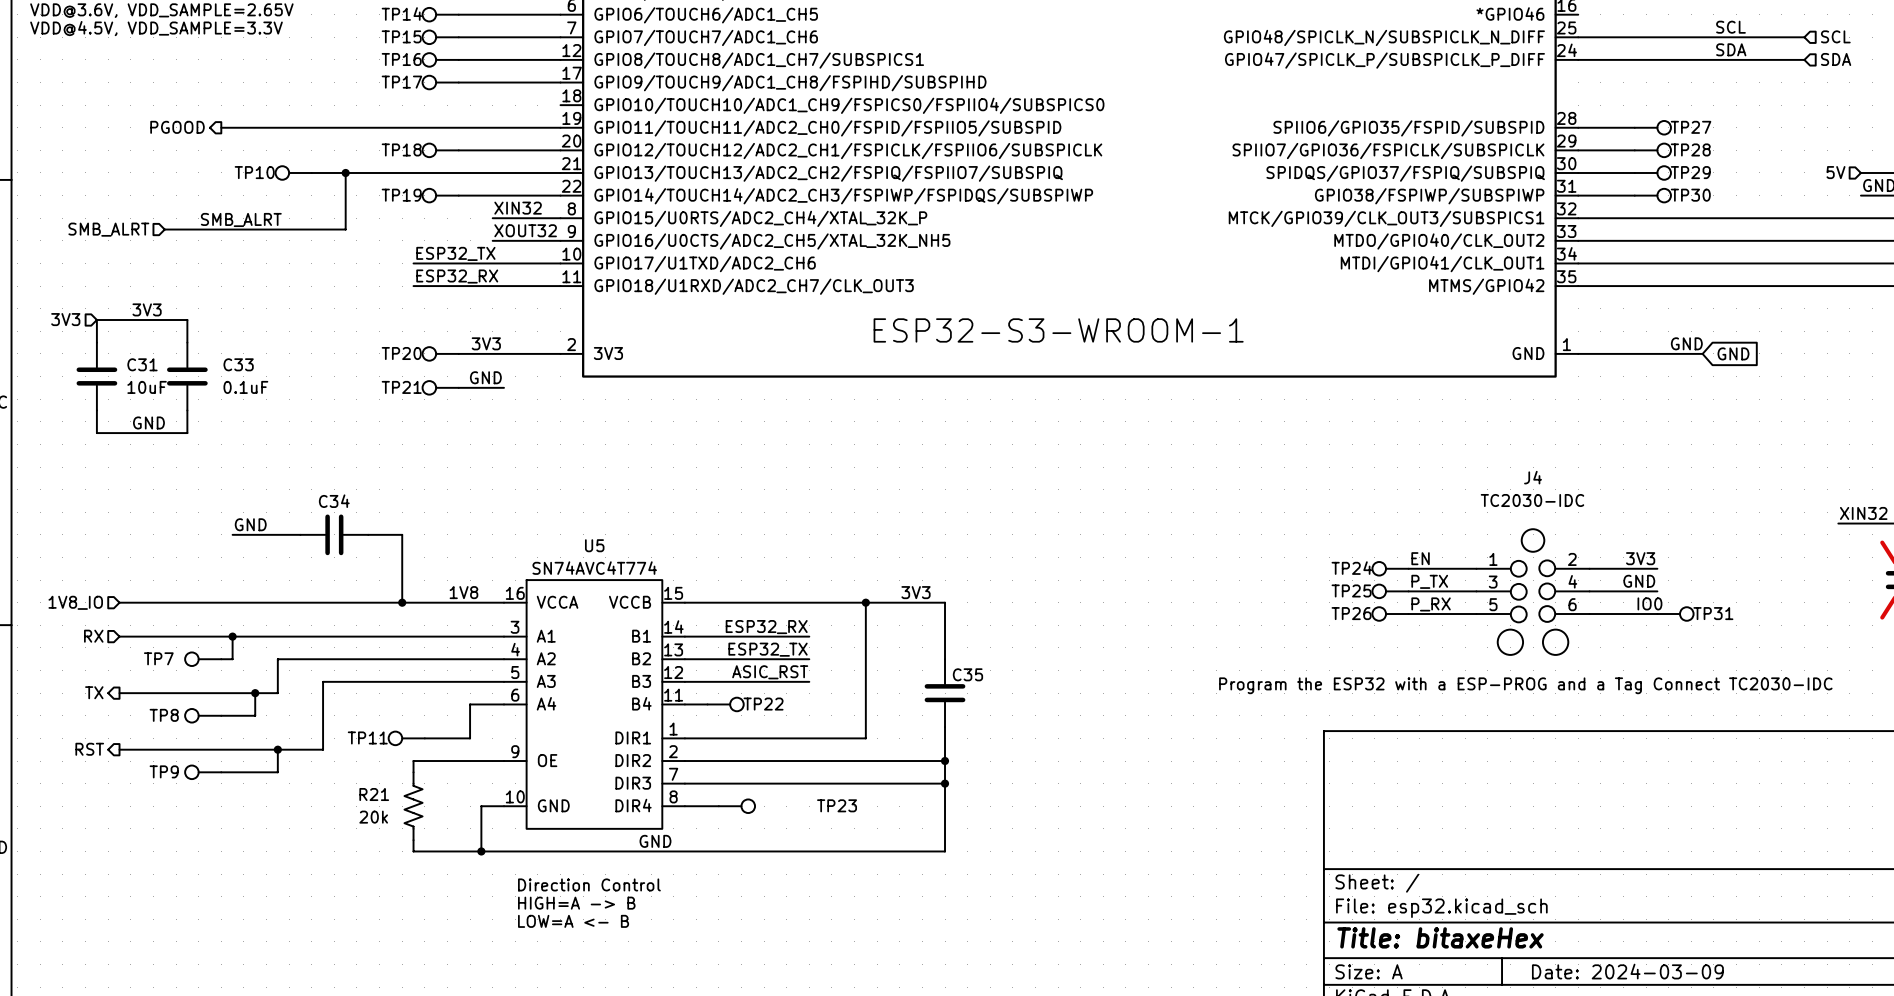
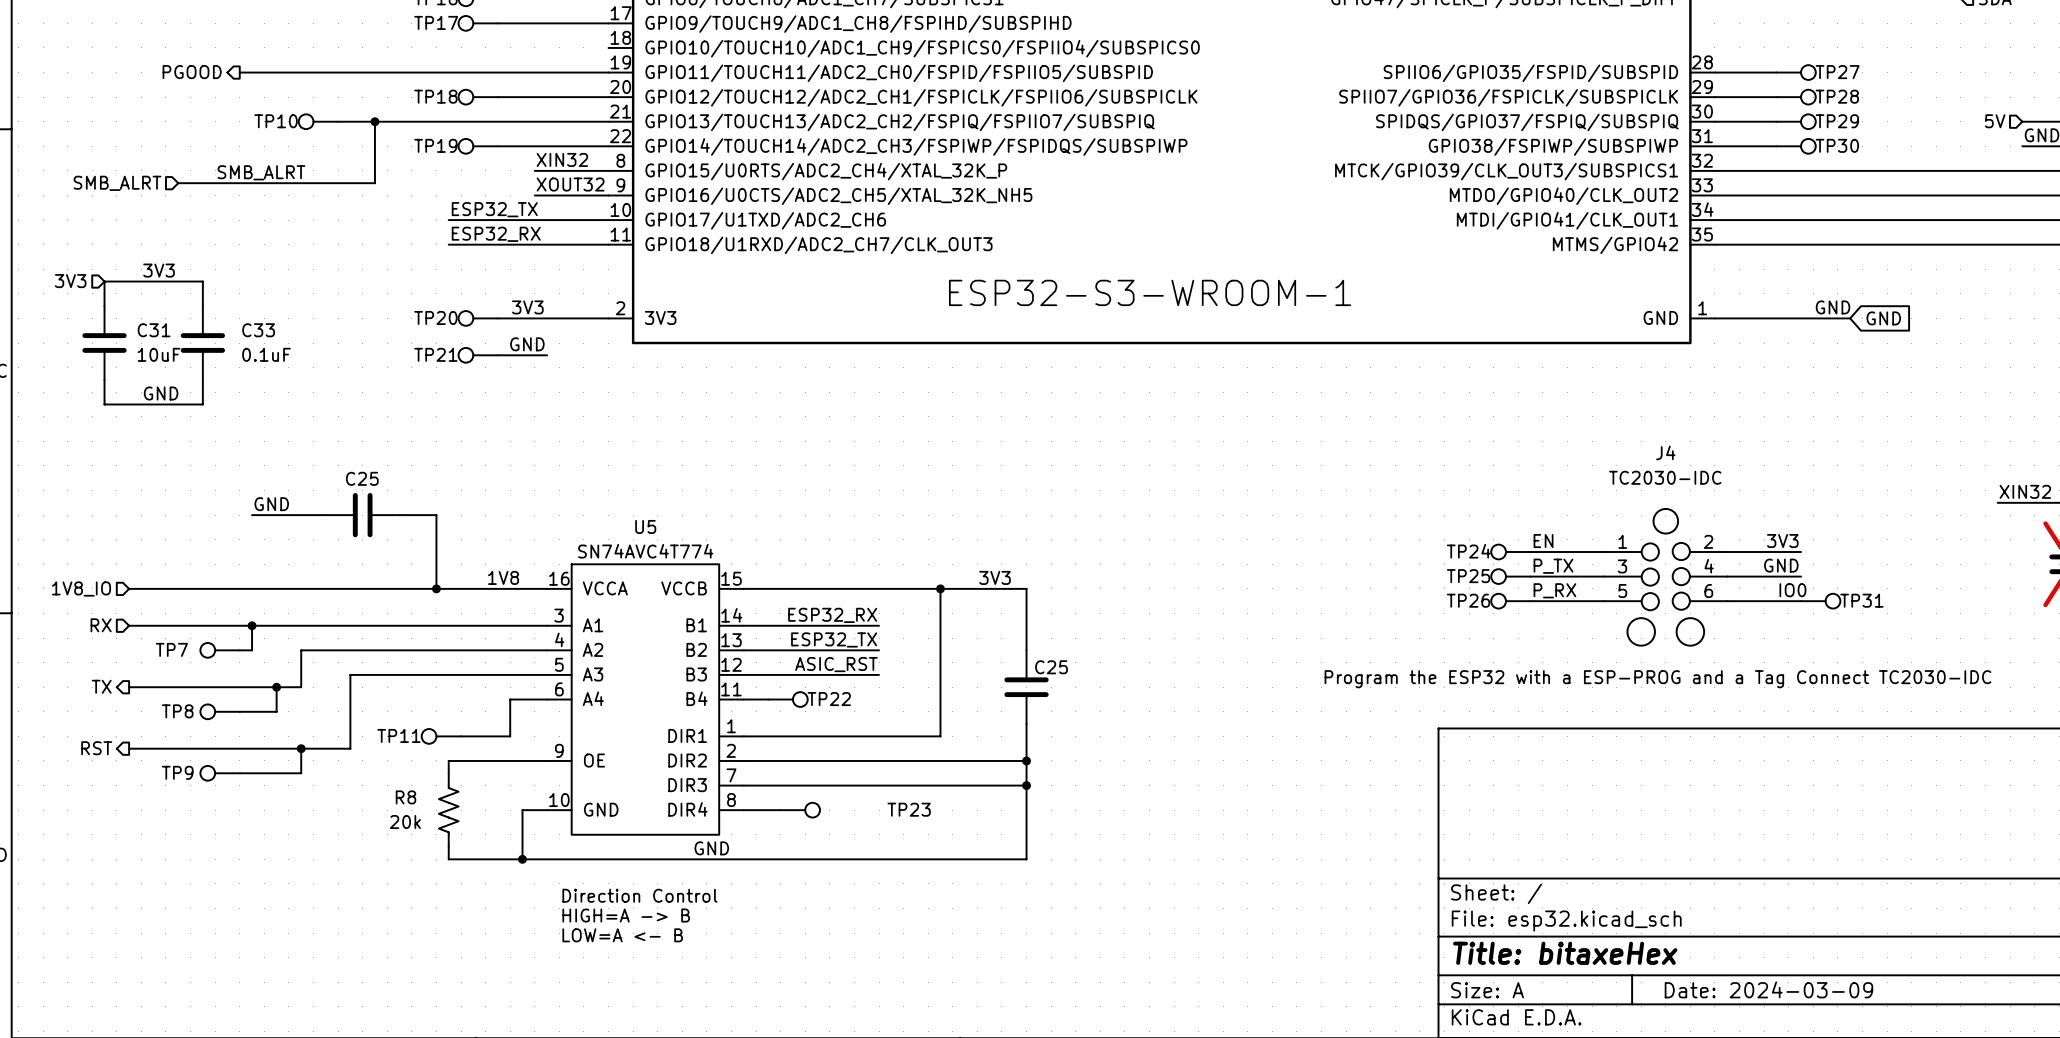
C34 name: C34 (334, 501) -> C25 (362, 478)
C35 name: C35 (967, 674) -> C25 (1051, 667)
R21 name: R21 (374, 794) -> R8 (406, 797)

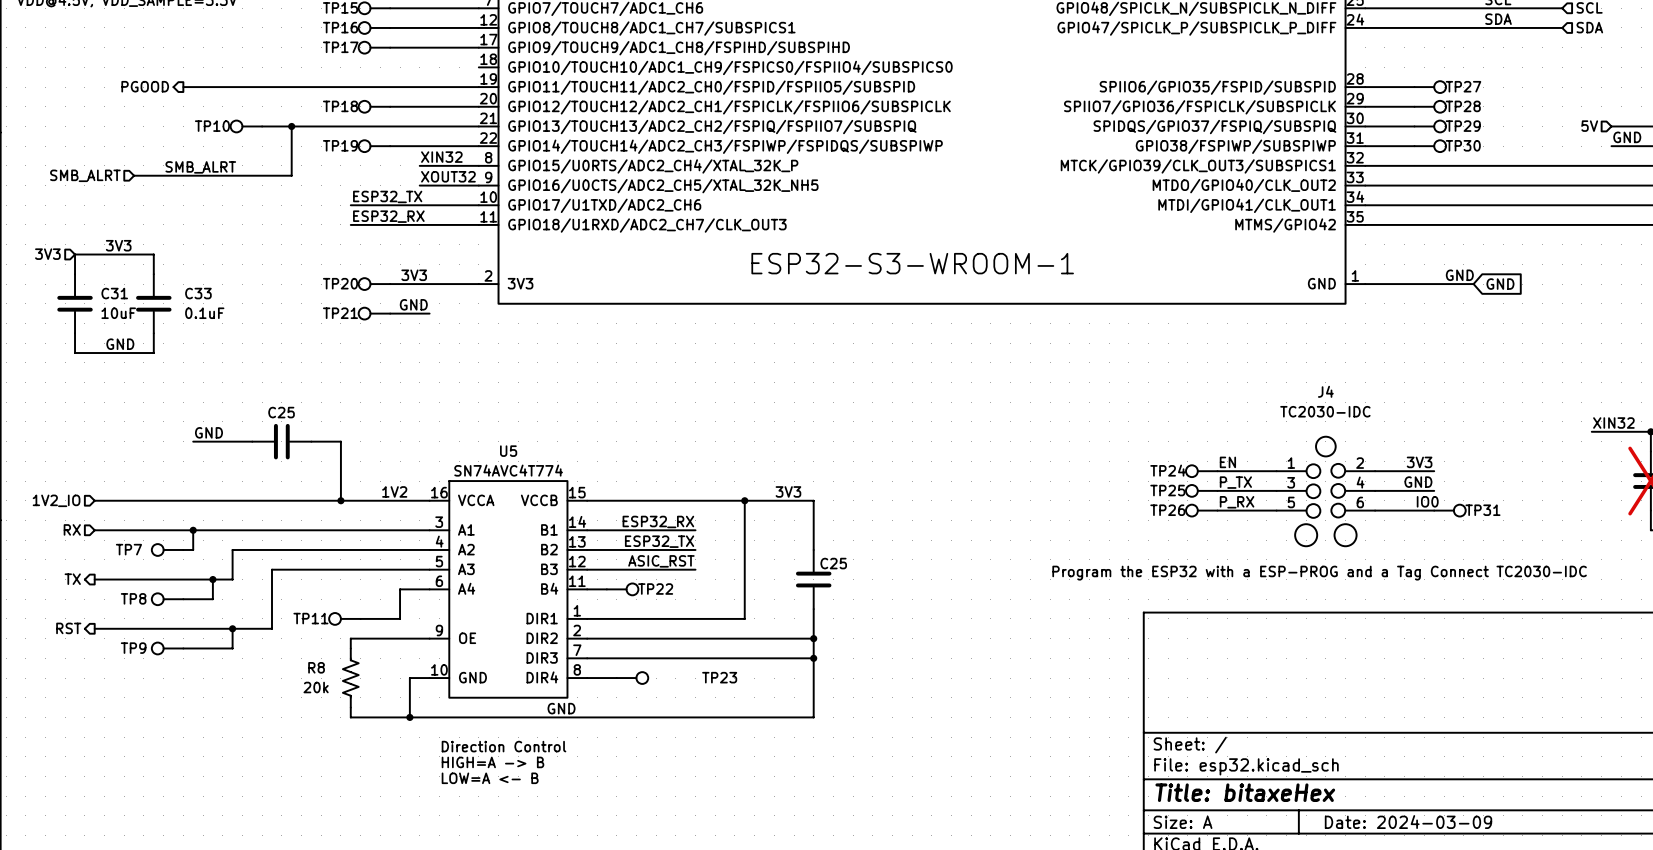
label: 1V8 (503, 577) -> 1V2 (394, 491)
hierarchical label: 1V8_IO (81, 589) -> 1V2_IO (56, 500)

